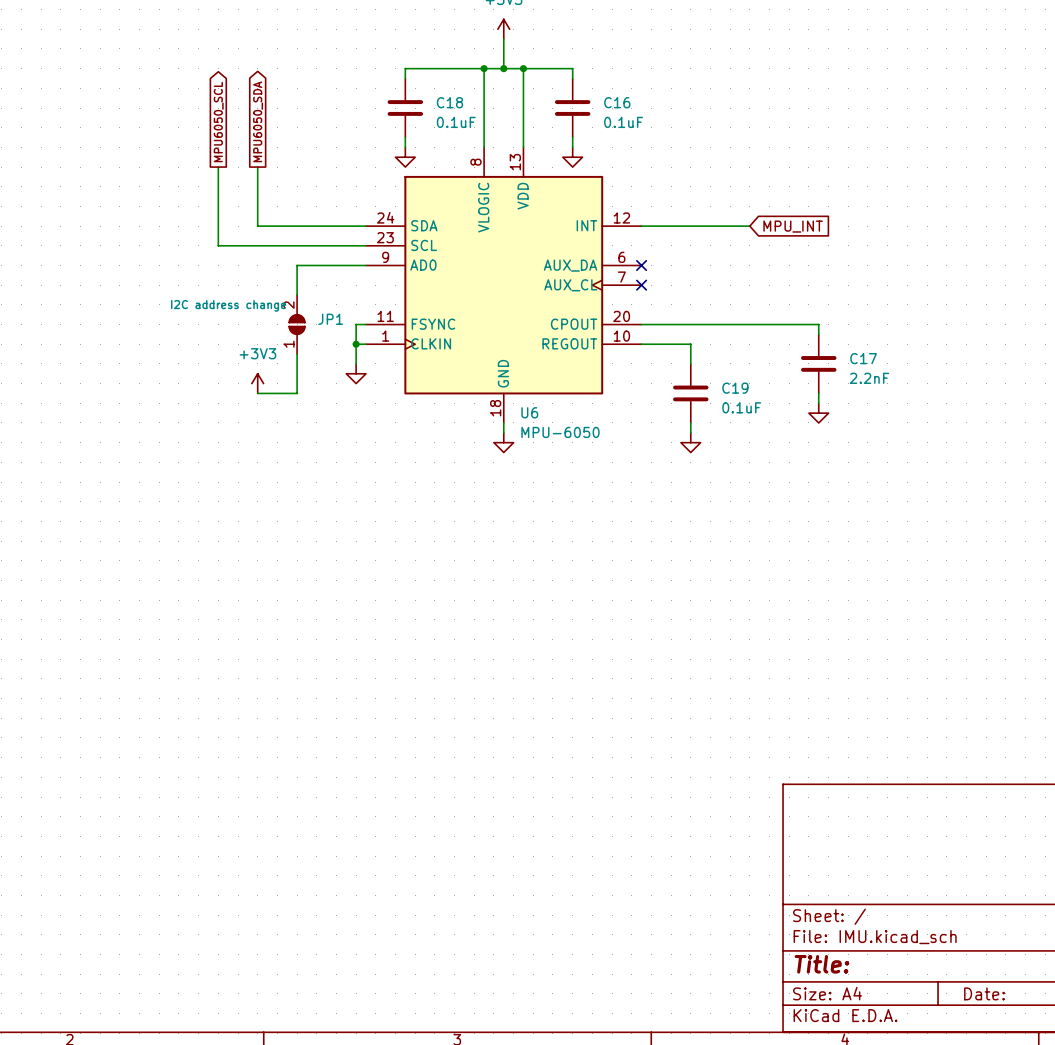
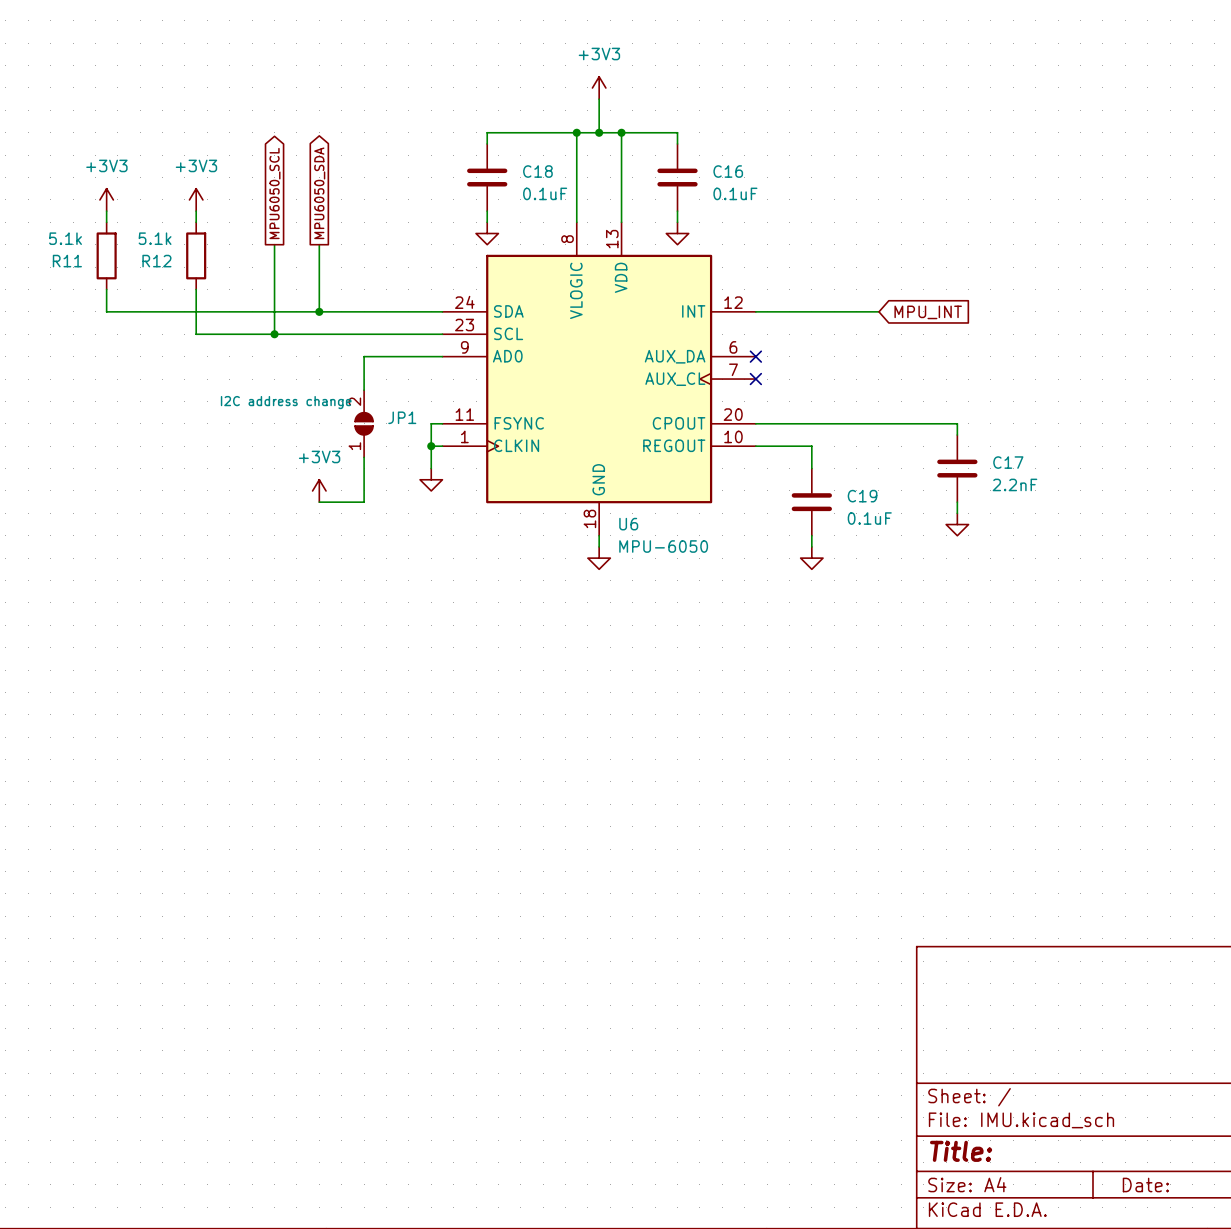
power symbol: none -> +3V3 (106, 199)
power symbol: none -> +3V3 (196, 199)
wire: none -> (106, 211) (106, 222)
wire: none -> (196, 211) (196, 222)
R11: none -> 5.1k (106, 255)
R12: none -> 5.1k (196, 255)
wire: none -> (106, 289) (106, 311) (319, 311)
wire: none -> (196, 289) (196, 334) (274, 334)
junction: none -> (319, 311)
junction: none -> (274, 334)

